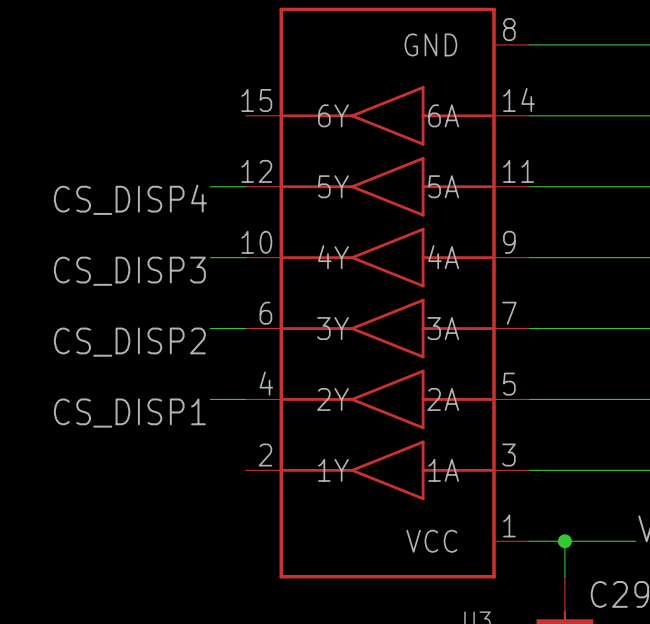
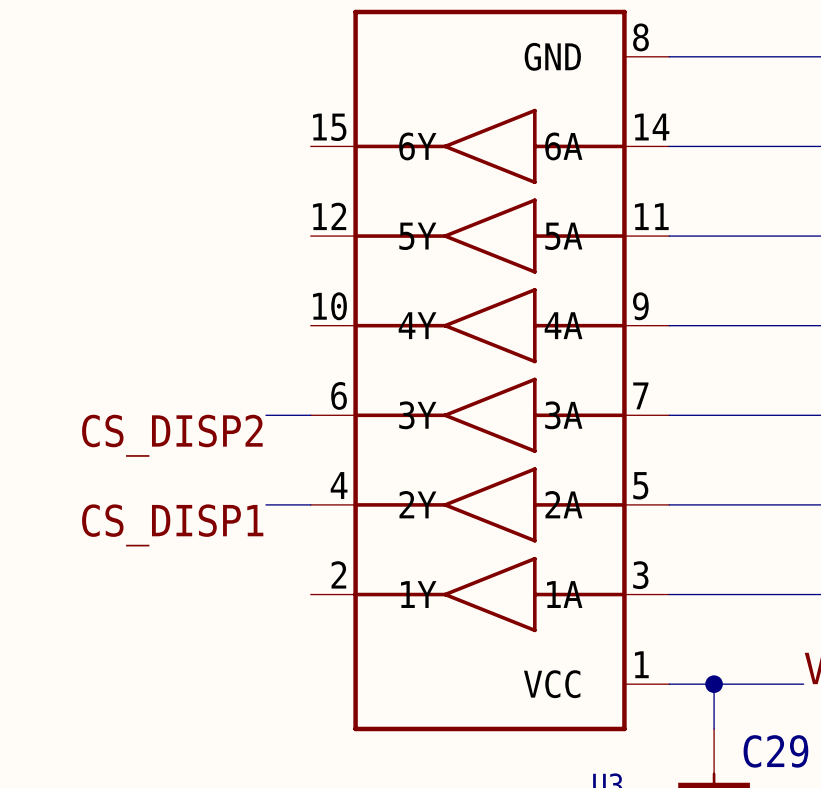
wire: (210, 186) (245, 186) -> none
label: CS_DISP4 (130, 199) -> none
wire: (210, 257) (245, 257) -> none
label: CS_DISP3 (129, 271) -> none

